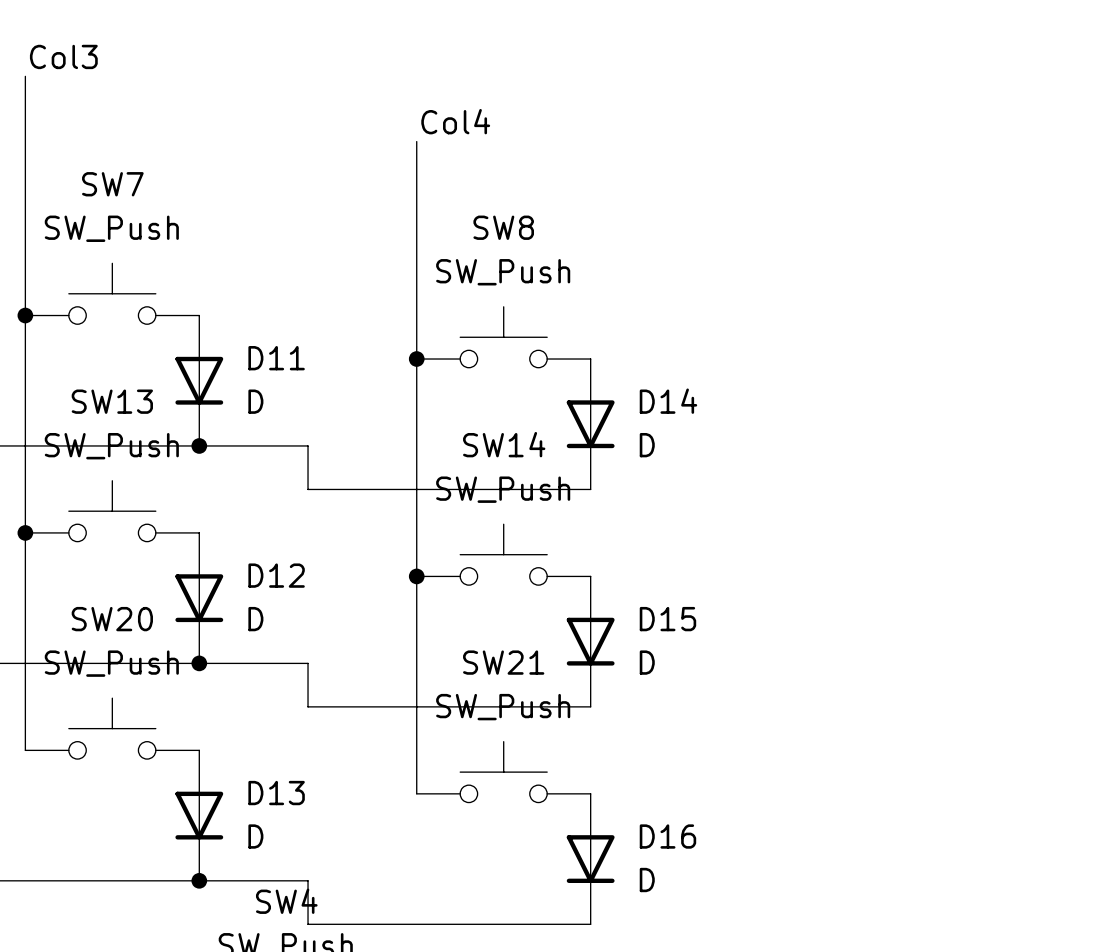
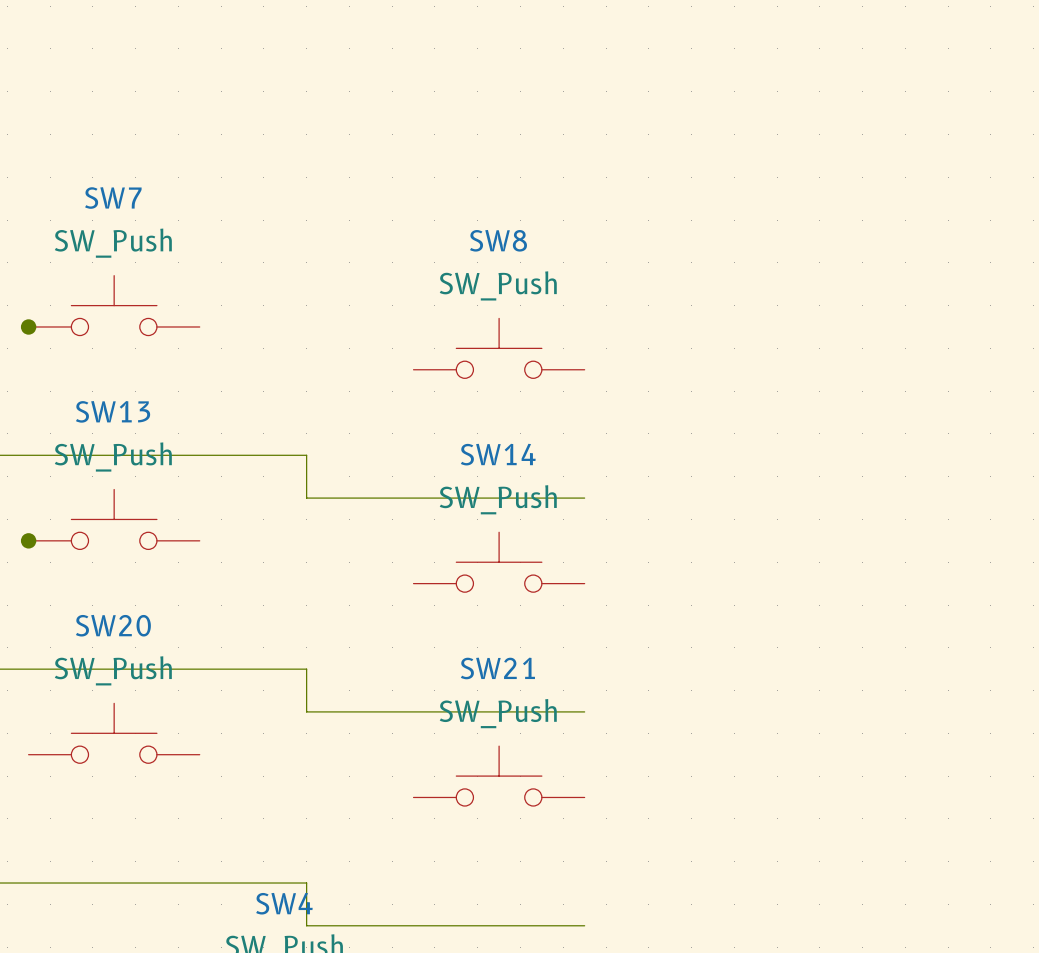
label: Col3 (63, 56) -> none
wire: (25, 76) (25, 750) -> none
label: Col4 (455, 121) -> none
wire: (416, 141) (416, 793) -> none
junction: (416, 359) -> none
D11: D (199, 380) -> none
D14: D (590, 424) -> none
junction: (199, 445) -> none
junction: (416, 576) -> none
D12: D (199, 598) -> none
D15: D (590, 641) -> none
junction: (199, 663) -> none
D13: D (199, 815) -> none
D16: D (590, 859) -> none
junction: (199, 880) -> none

